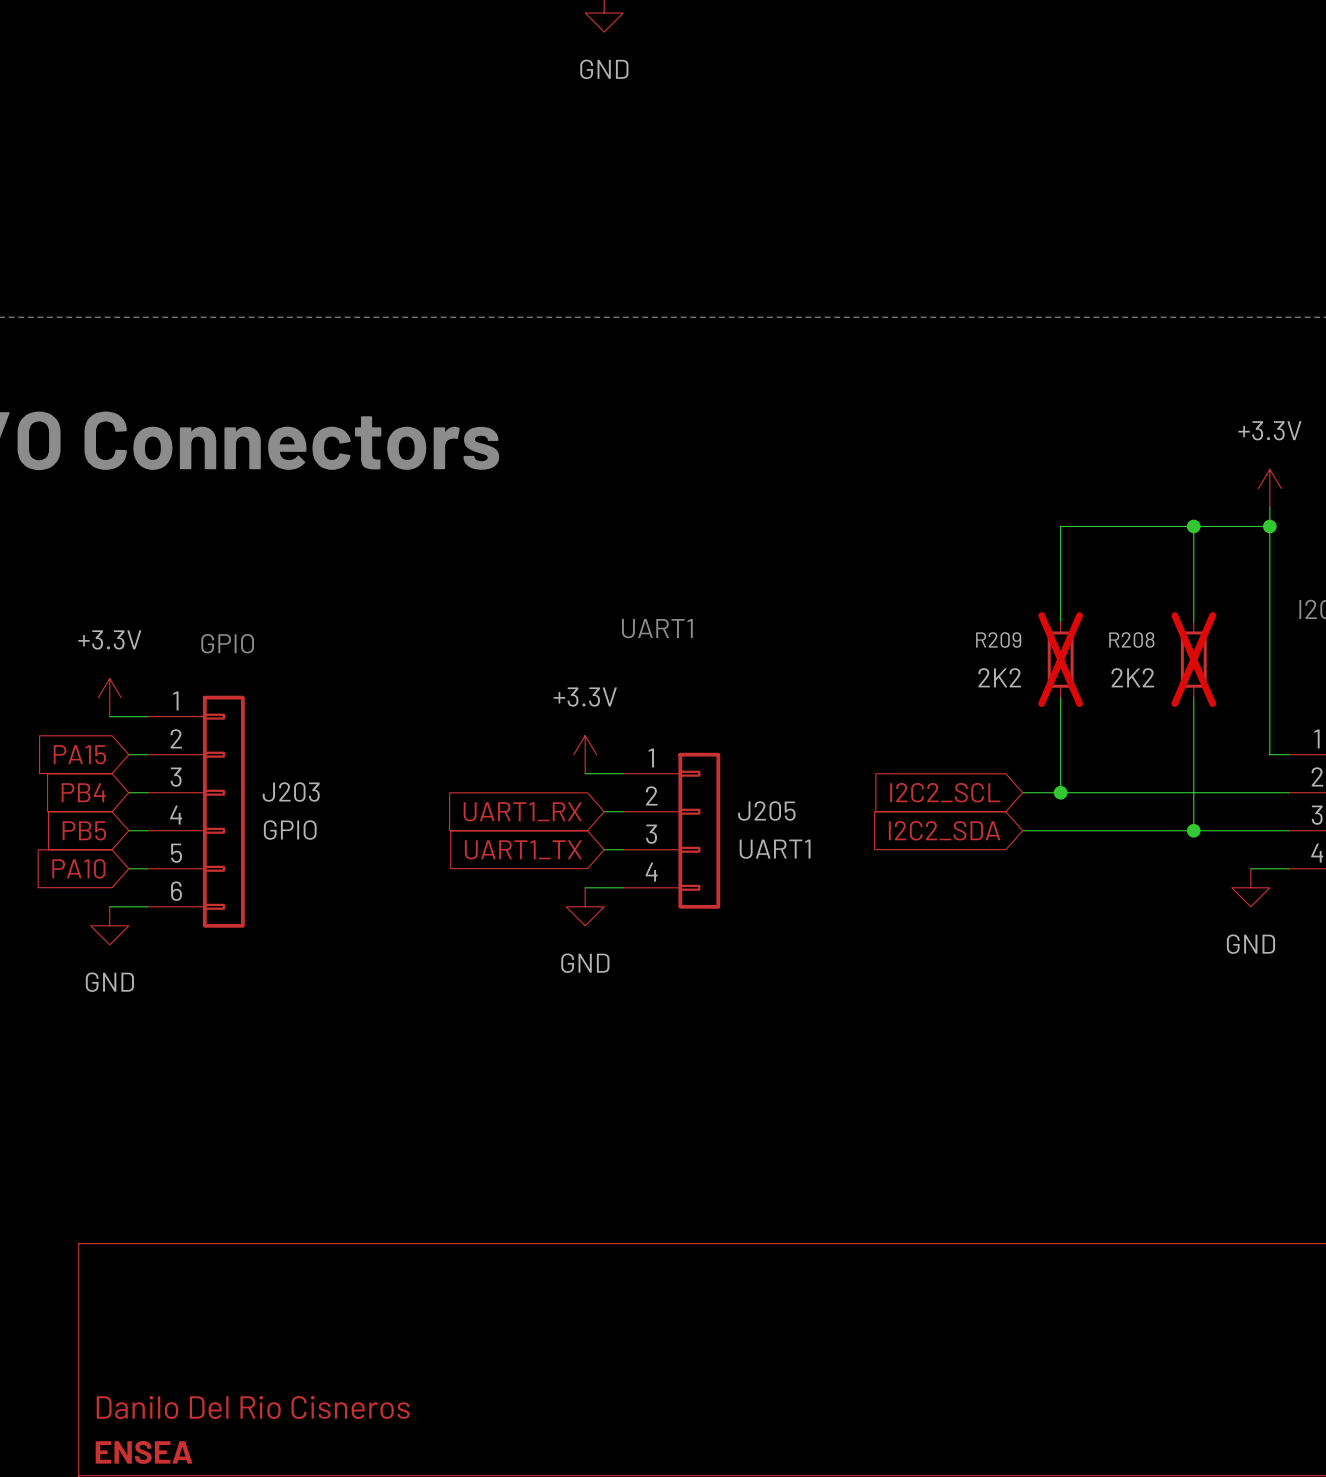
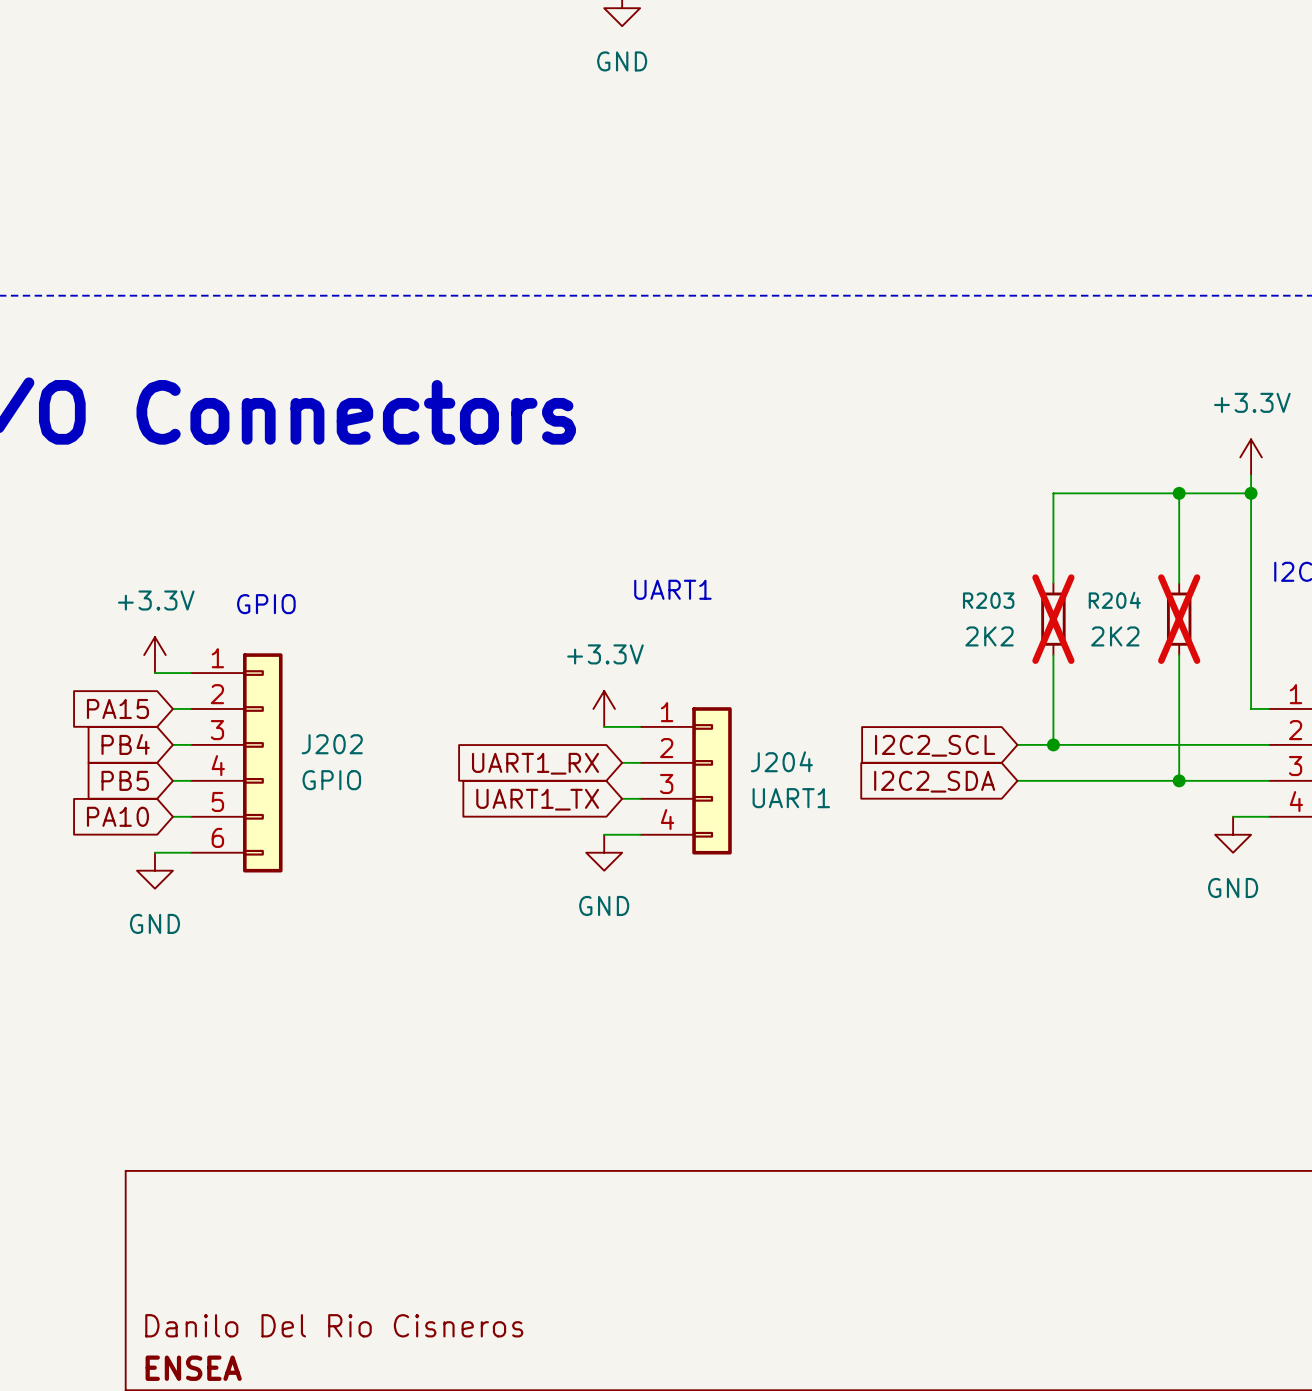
R209 name: R209 (998, 640) -> R203 (988, 600)
R208 name: R208 (1131, 640) -> R204 (1114, 600)
J203 name: J203 (291, 792) -> J202 (332, 744)
J205 name: J205 (766, 811) -> J204 (781, 761)

